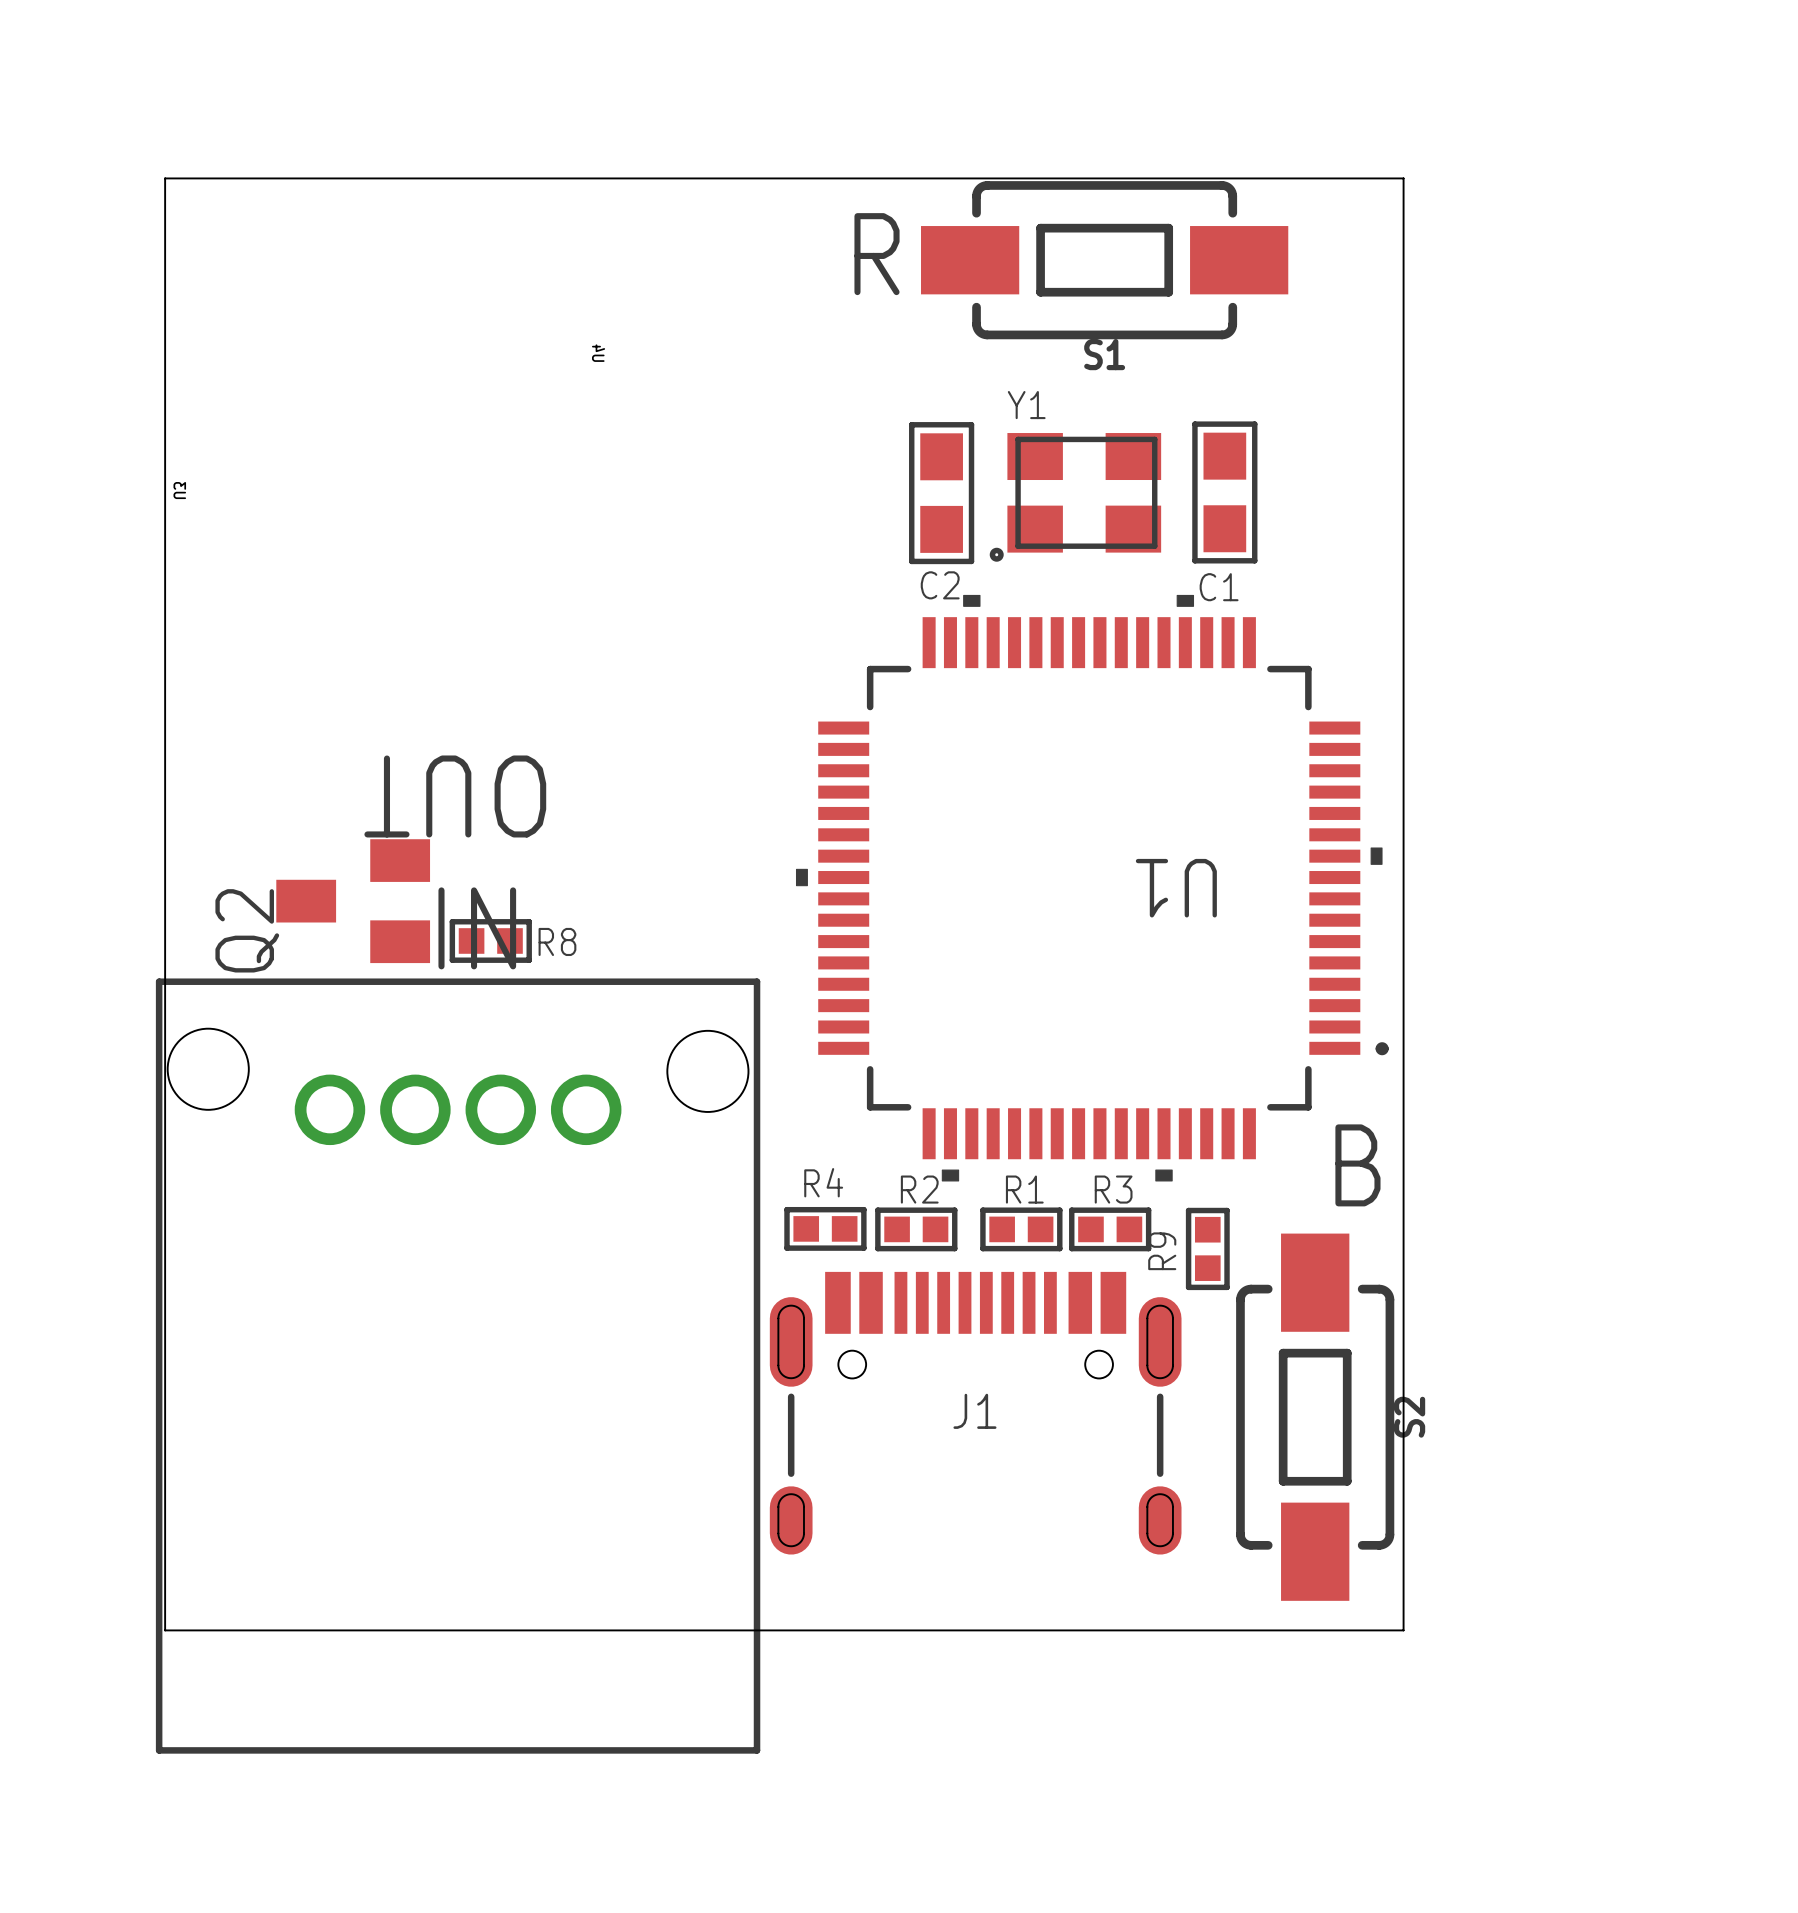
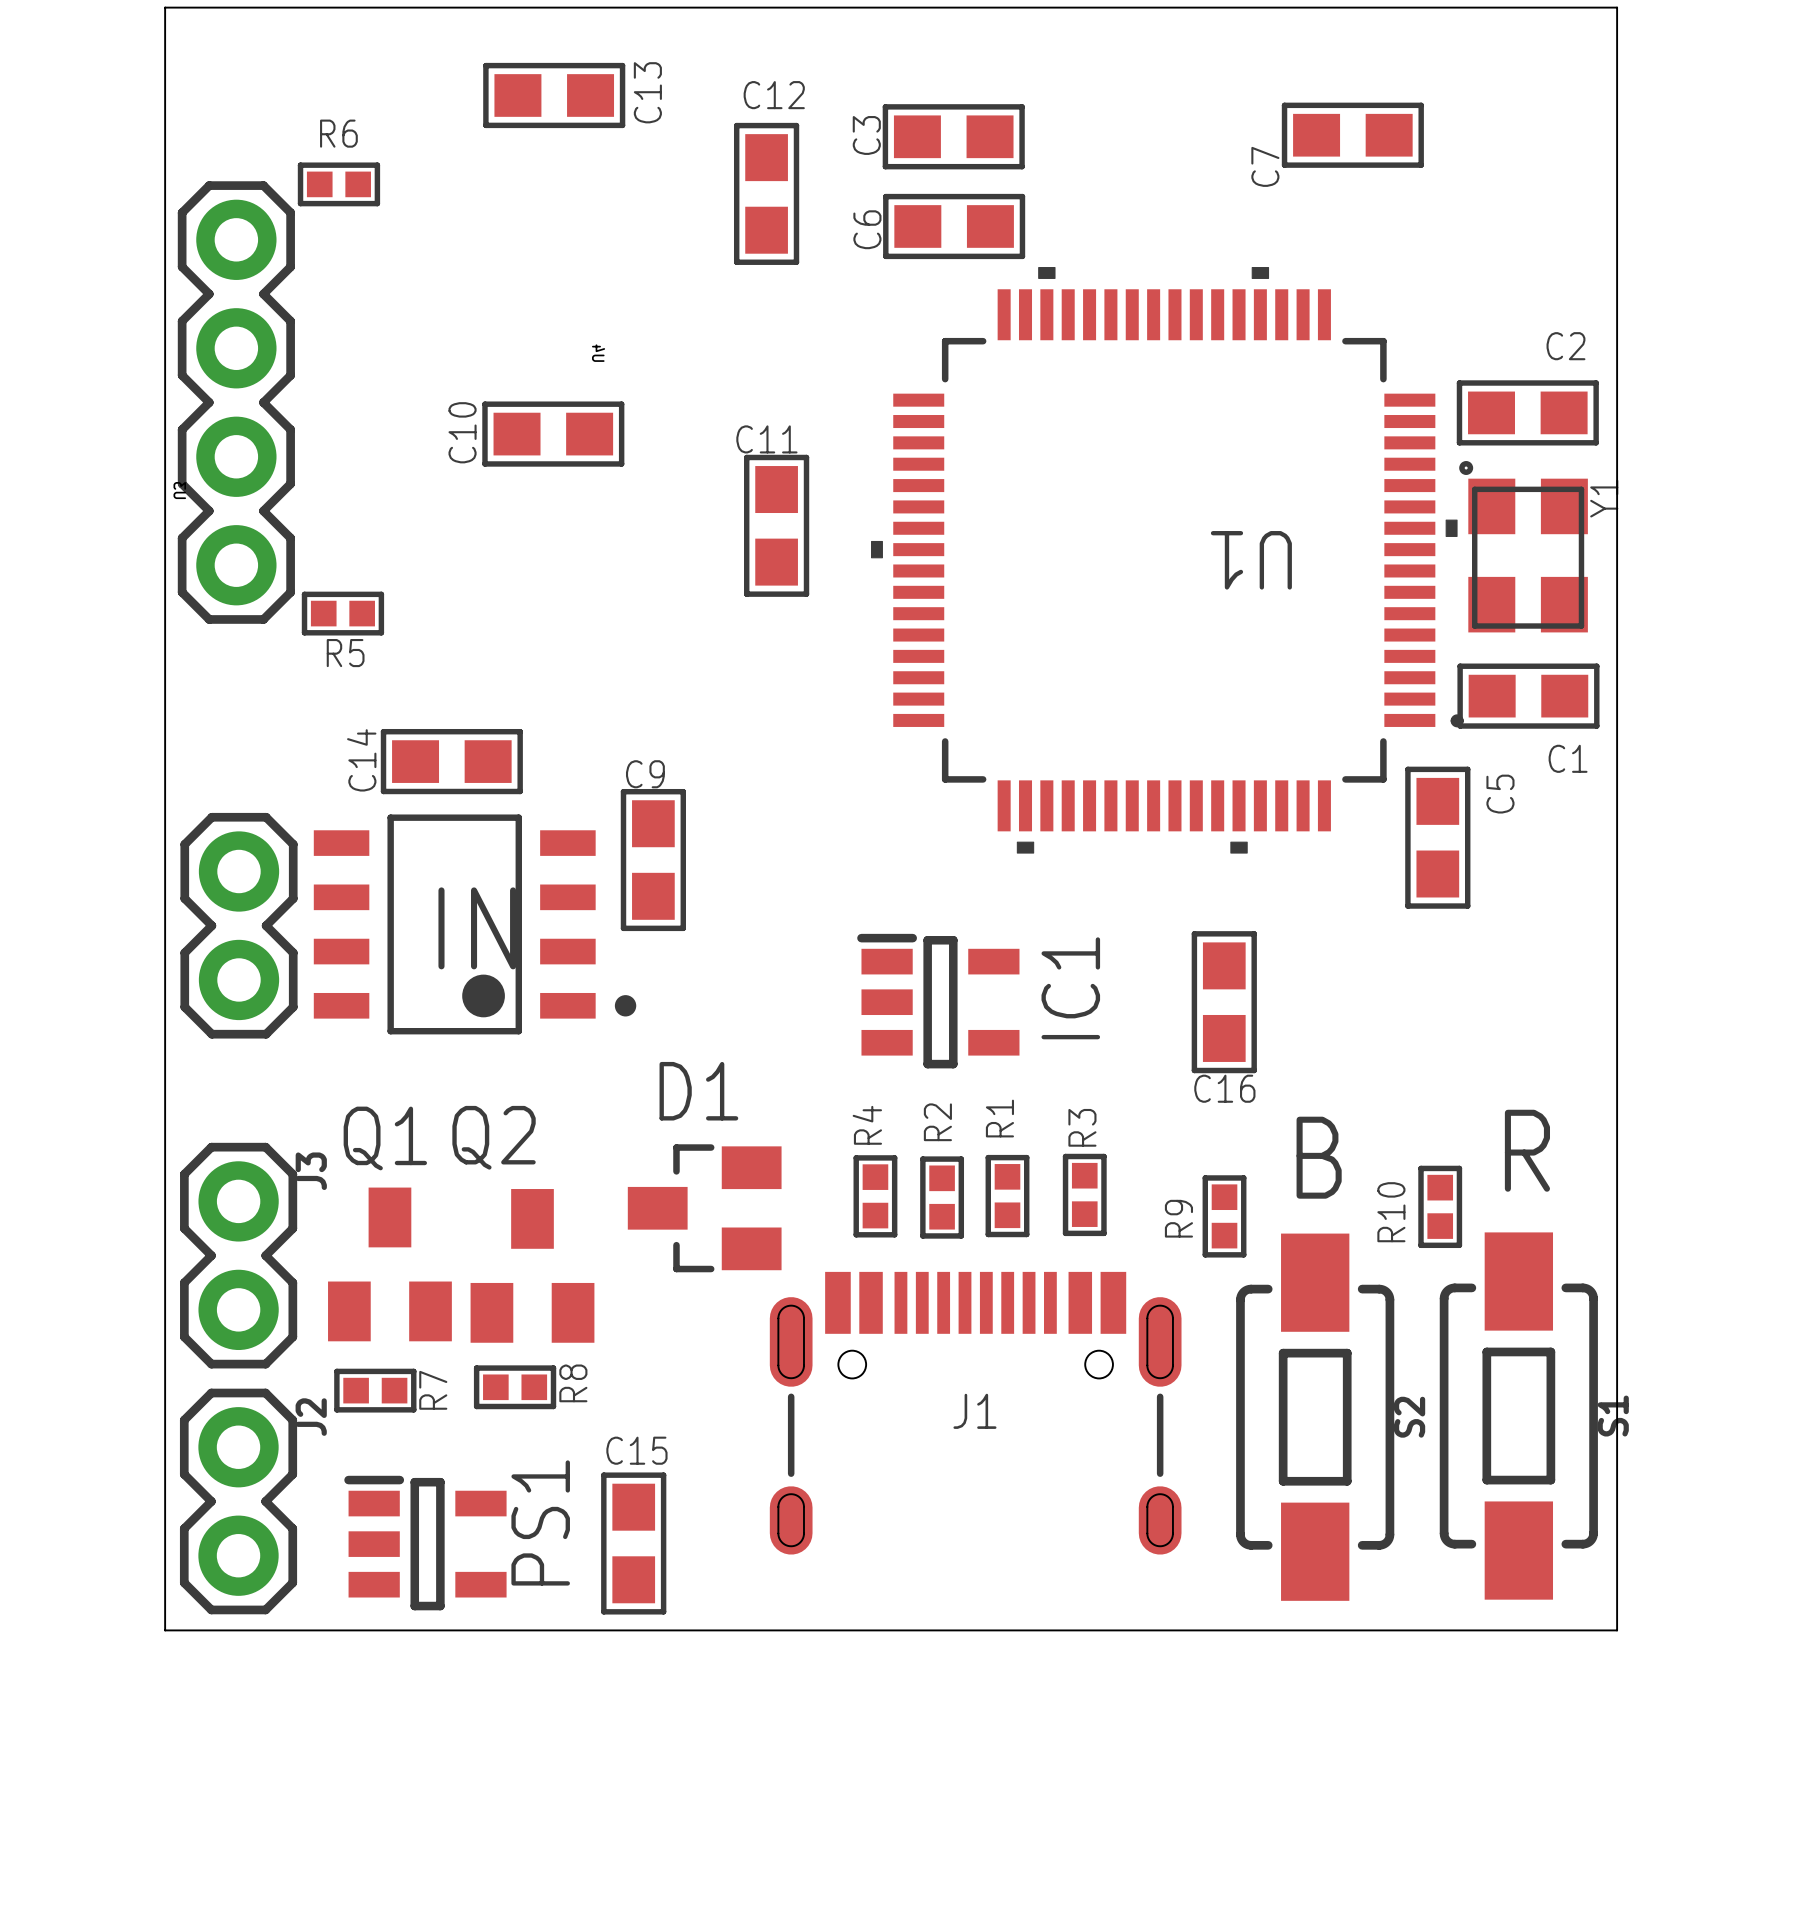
C13: none -> (554, 95)
C7: none -> (1352, 135)
C3: none -> (953, 136)
board edge: (165, 178) (1403, 178) (1403, 1630) -> (165, 178) (165, 7) (1617, 7) (1617, 1630) (1403, 1630)
R6: none -> (338, 184)
C12: none -> (766, 193)
C6: none -> (954, 226)
text: R (877, 254) -> none
S1 rotation: 0° (1104, 260) -> 90° clockwise (1518, 1416)
S1 position: (1104, 260) -> (1518, 1416)
S1 name position: S1 (1104, 354) -> S1 (1613, 1416)
part: none -> (236, 402)
C10: none -> (553, 434)
C1 rotation: 0° (1224, 492) -> 90° clockwise (1528, 696)
C1 position: (1224, 492) -> (1528, 696)
C2 rotation: 0° (941, 493) -> 90° clockwise (1527, 412)
C2 position: (941, 493) -> (1527, 412)
Y1 rotation: 0° (1075, 497) -> 90° clockwise (1523, 546)
Y1 position: (1075, 497) -> (1523, 546)
C11: none -> (776, 525)
C2 name position: C2 (940, 585) -> C2 (1565, 346)
R5: none -> (342, 613)
C14: none -> (451, 761)
text: OUT (455, 796) -> none
C5: none -> (1437, 837)
C9: none -> (653, 860)
U1 position: (1092, 888) -> (1167, 560)
Q2 rotation: 0° (353, 901) -> 90° clockwise (532, 1265)
Q2 position: (353, 901) -> (532, 1265)
part: none -> (475, 924)
part: none -> (239, 925)
R8 position: (490, 940) -> (515, 1387)
R8 name rotation: 0° (557, 941) -> 90° counterclockwise (573, 1383)
IC1: none -> (938, 1001)
C16: none -> (1224, 1002)
text: none -> R (1527, 1150)
text position: B (1357, 1165) -> B (1319, 1157)
R10: none -> (1440, 1206)
D1: none -> (704, 1208)
R4 rotation: 0° (825, 1228) -> 90° clockwise (875, 1196)
R4 position: (825, 1228) -> (875, 1196)
R2 rotation: 0° (916, 1229) -> 90° clockwise (942, 1197)
R1 rotation: 0° (1021, 1229) -> 90° clockwise (1007, 1196)
R3 rotation: 0° (1110, 1229) -> 90° clockwise (1084, 1194)
R9 position: (1207, 1248) -> (1224, 1216)
J3: none -> (238, 1255)
Q1: none -> (389, 1264)
part: (458, 1366) -> none
R7: none -> (375, 1390)
J2: none -> (238, 1501)
PS1: none -> (425, 1543)
C15: none -> (633, 1543)

